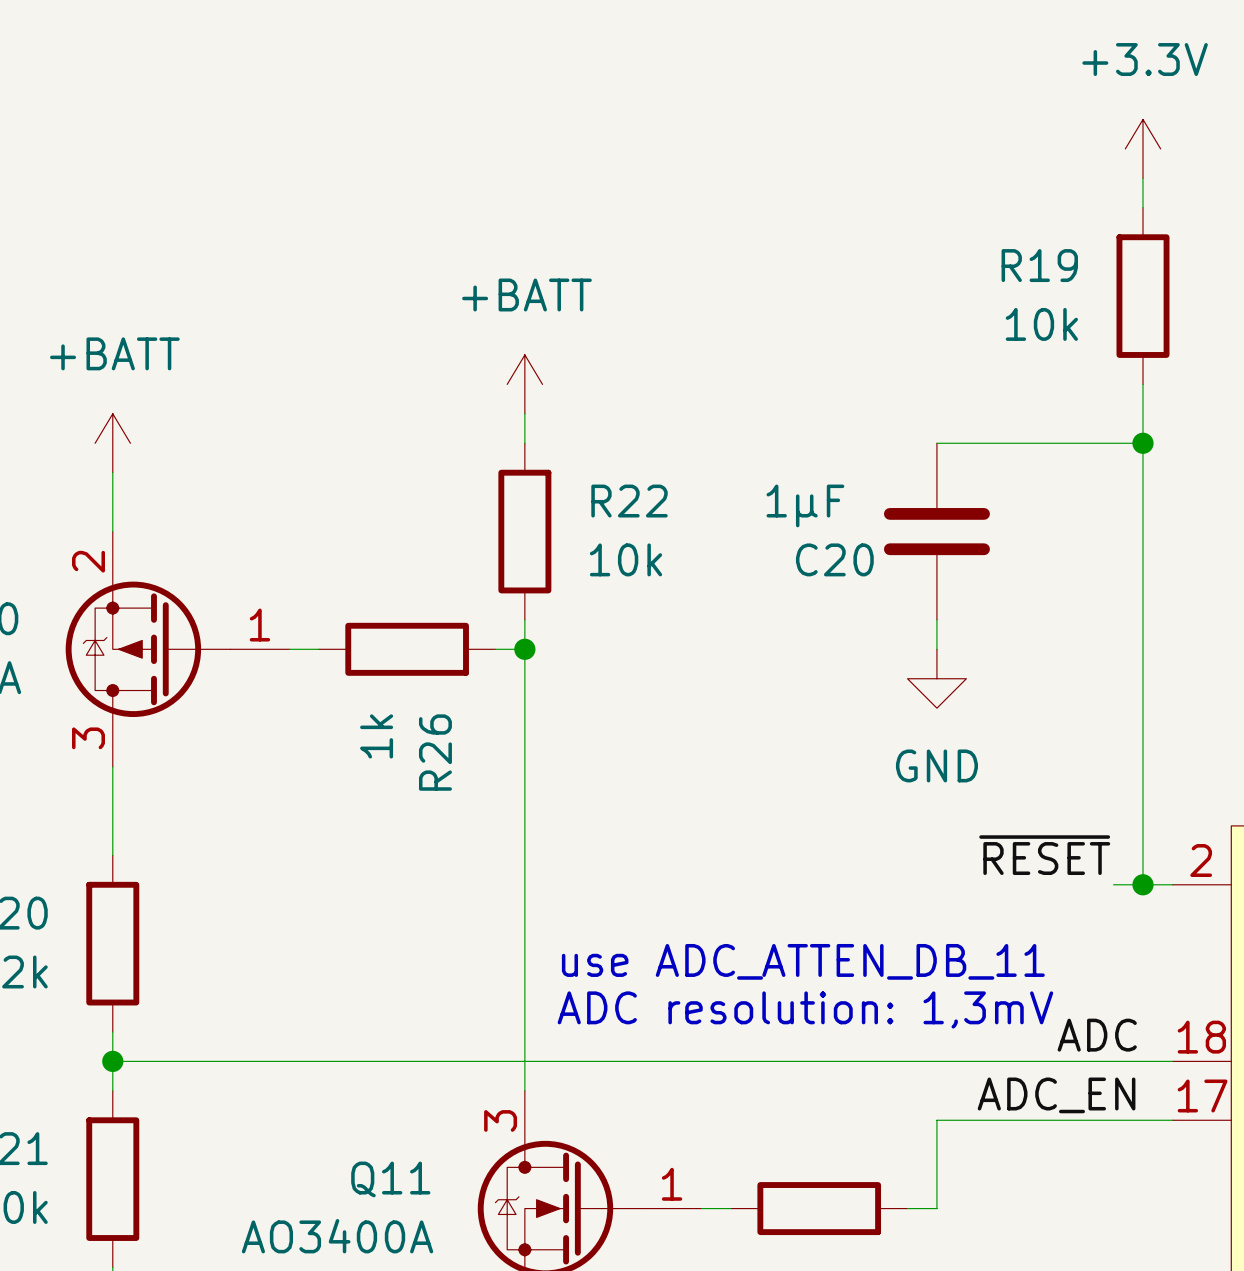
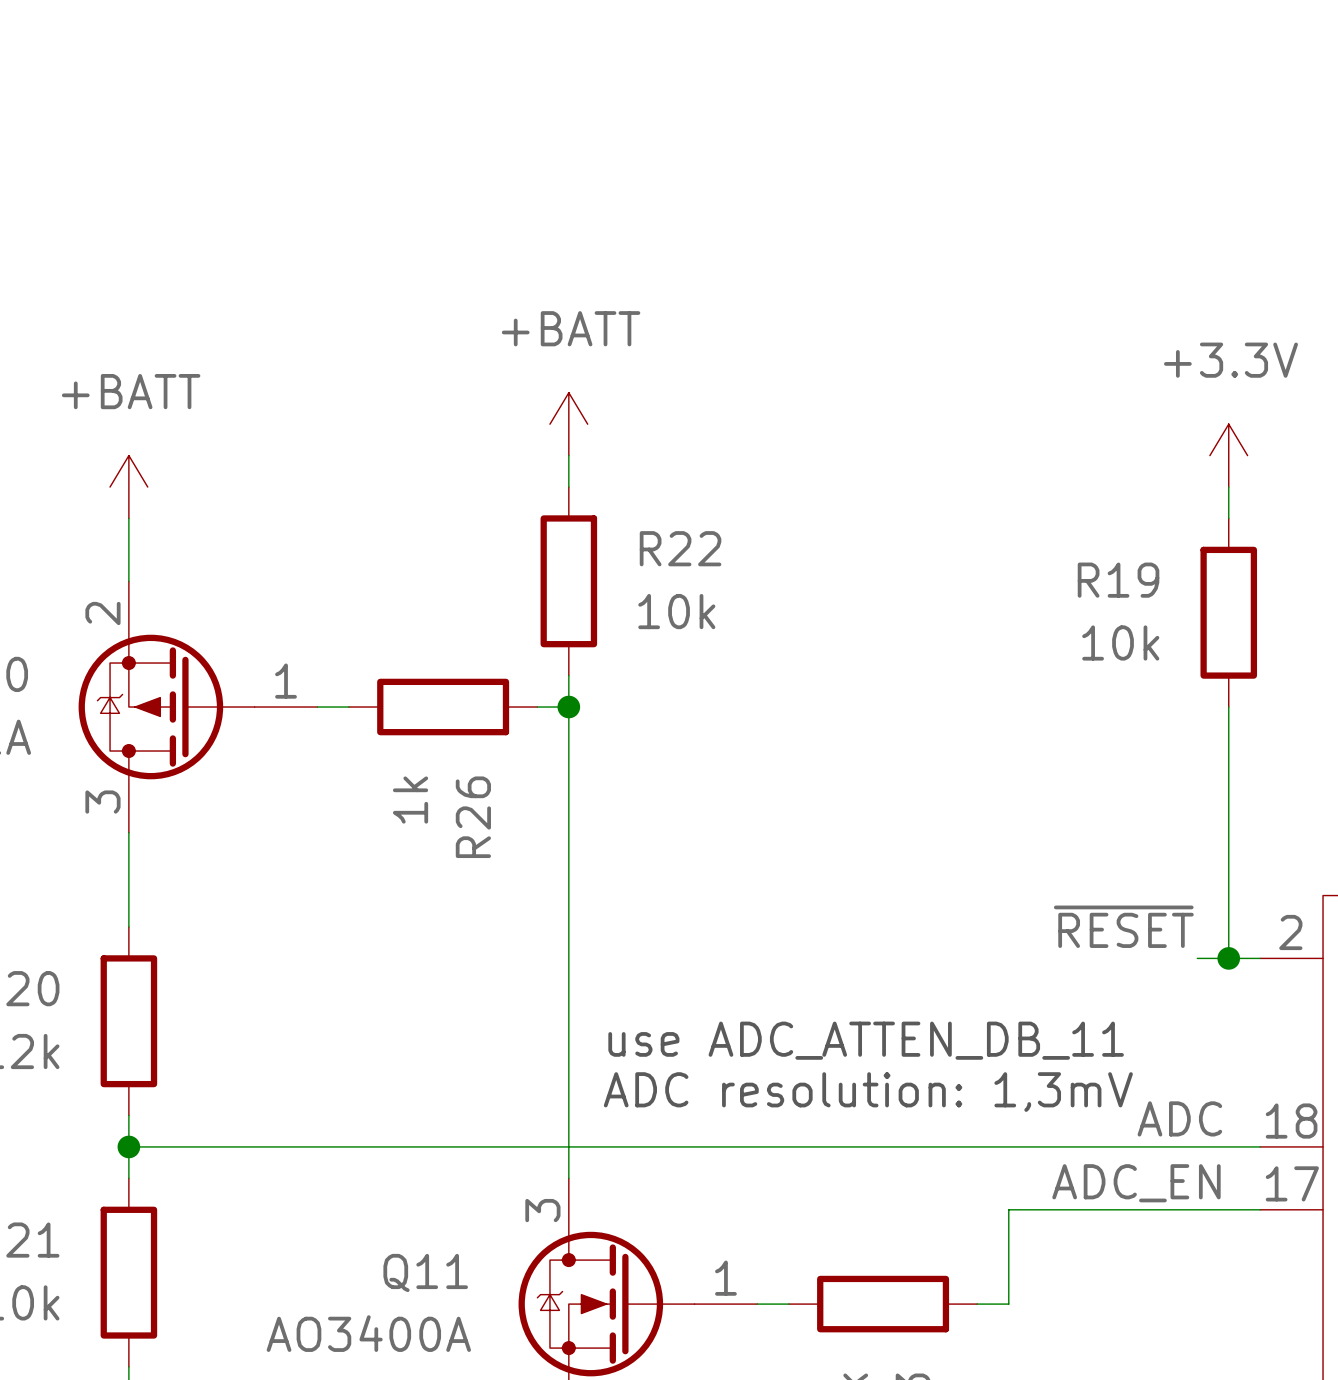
power symbol position: +3.3V (1142, 148) -> +3.3V (1228, 455)
wire: (1142, 178) (1142, 207) -> none
R19 position: (1142, 296) -> (1228, 612)
wire: (1142, 384) (1142, 443) (936, 443) -> none
junction: (1142, 443) -> none
wire: (1142, 472) (1142, 649) -> none
C20: 1µF (936, 531) -> none
wire: (936, 619) (936, 649) -> none
power symbol: GND (936, 678) -> none

